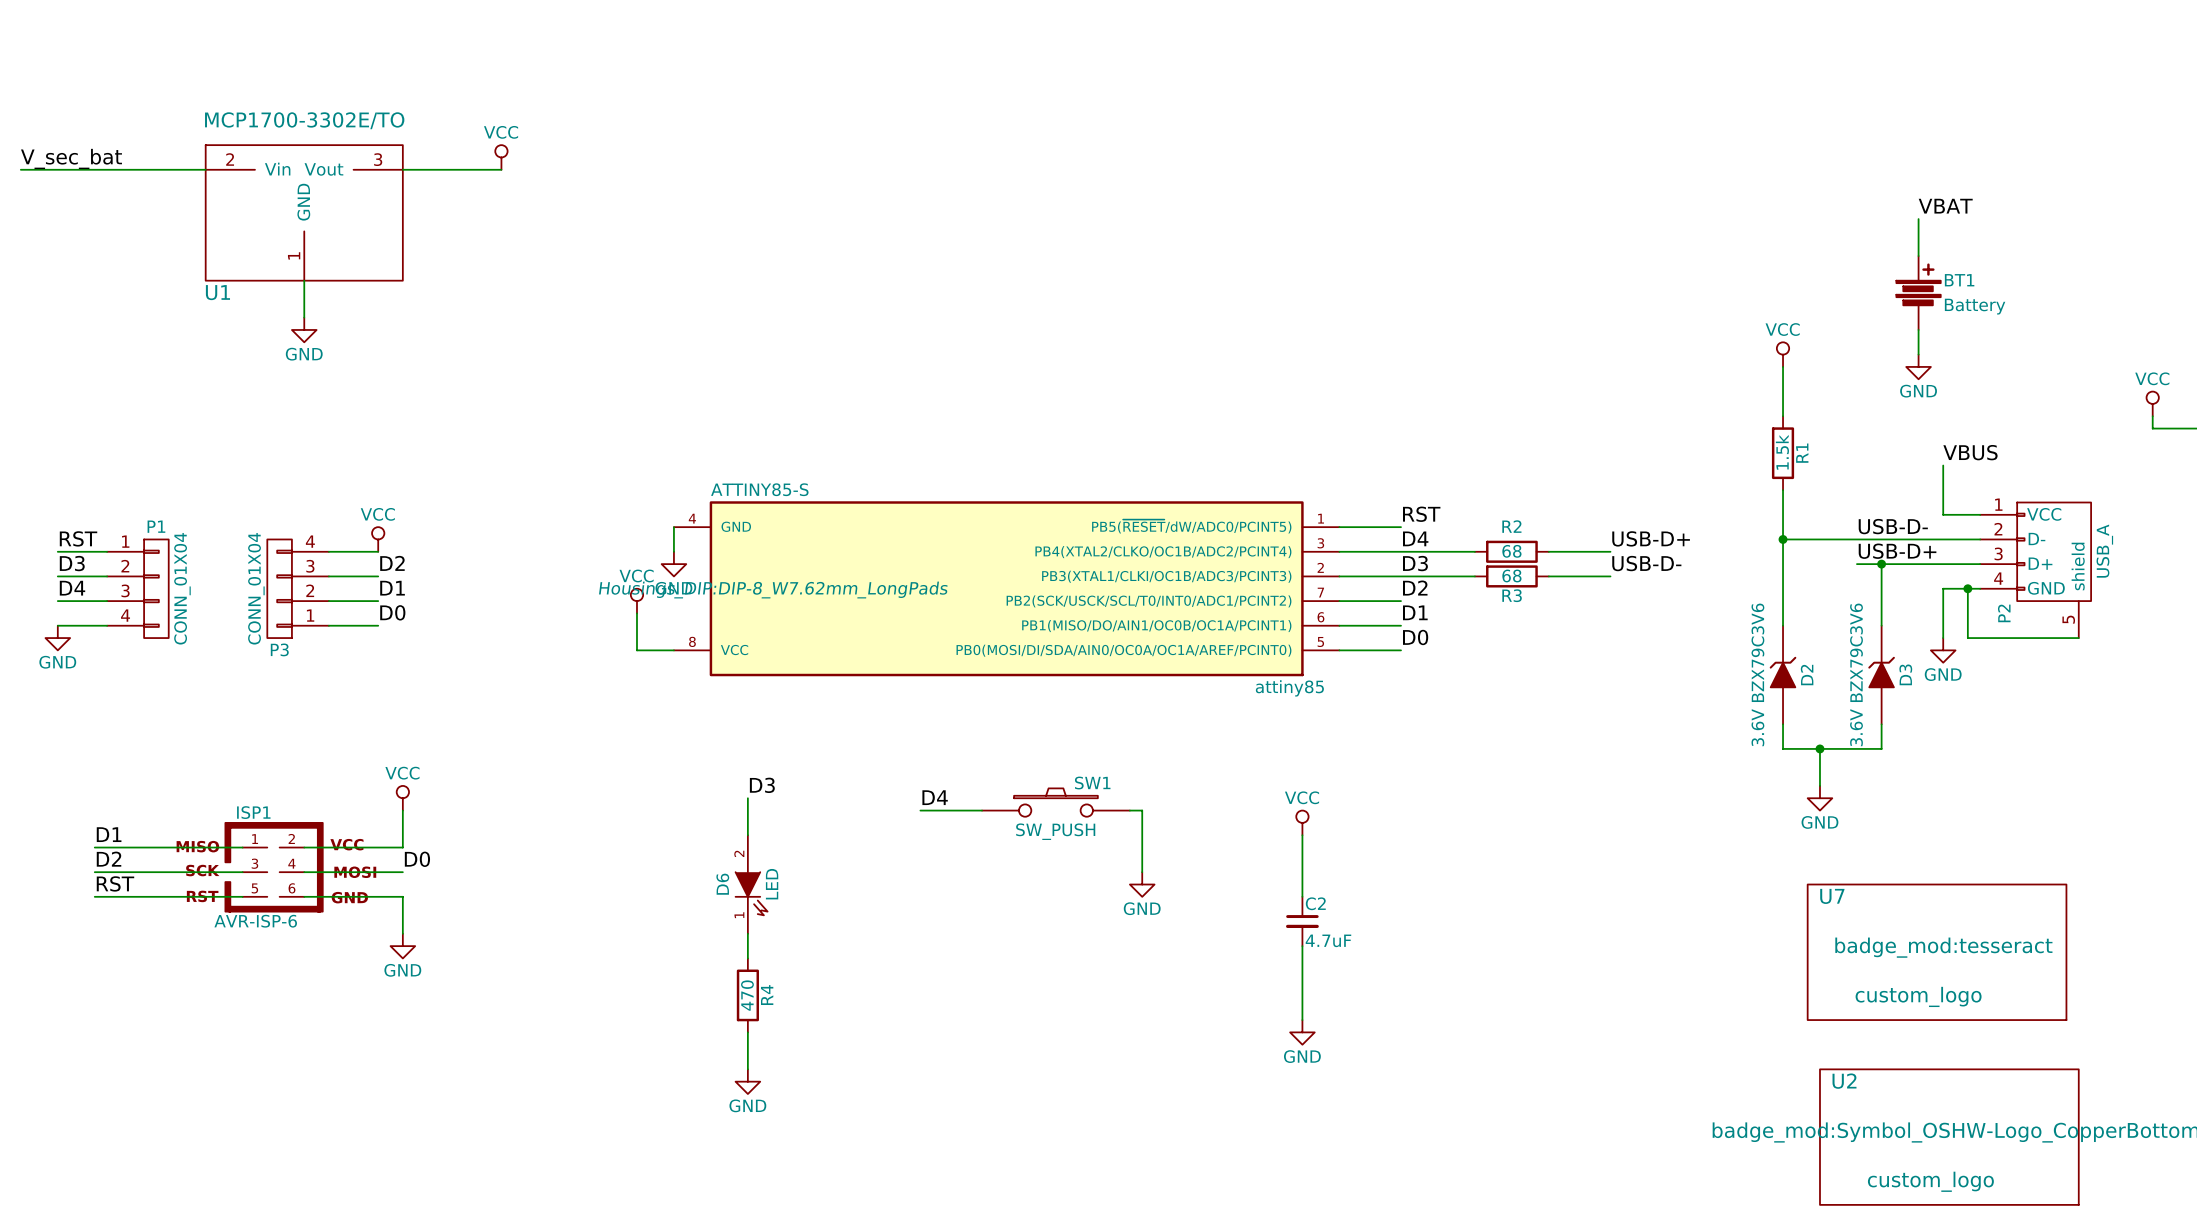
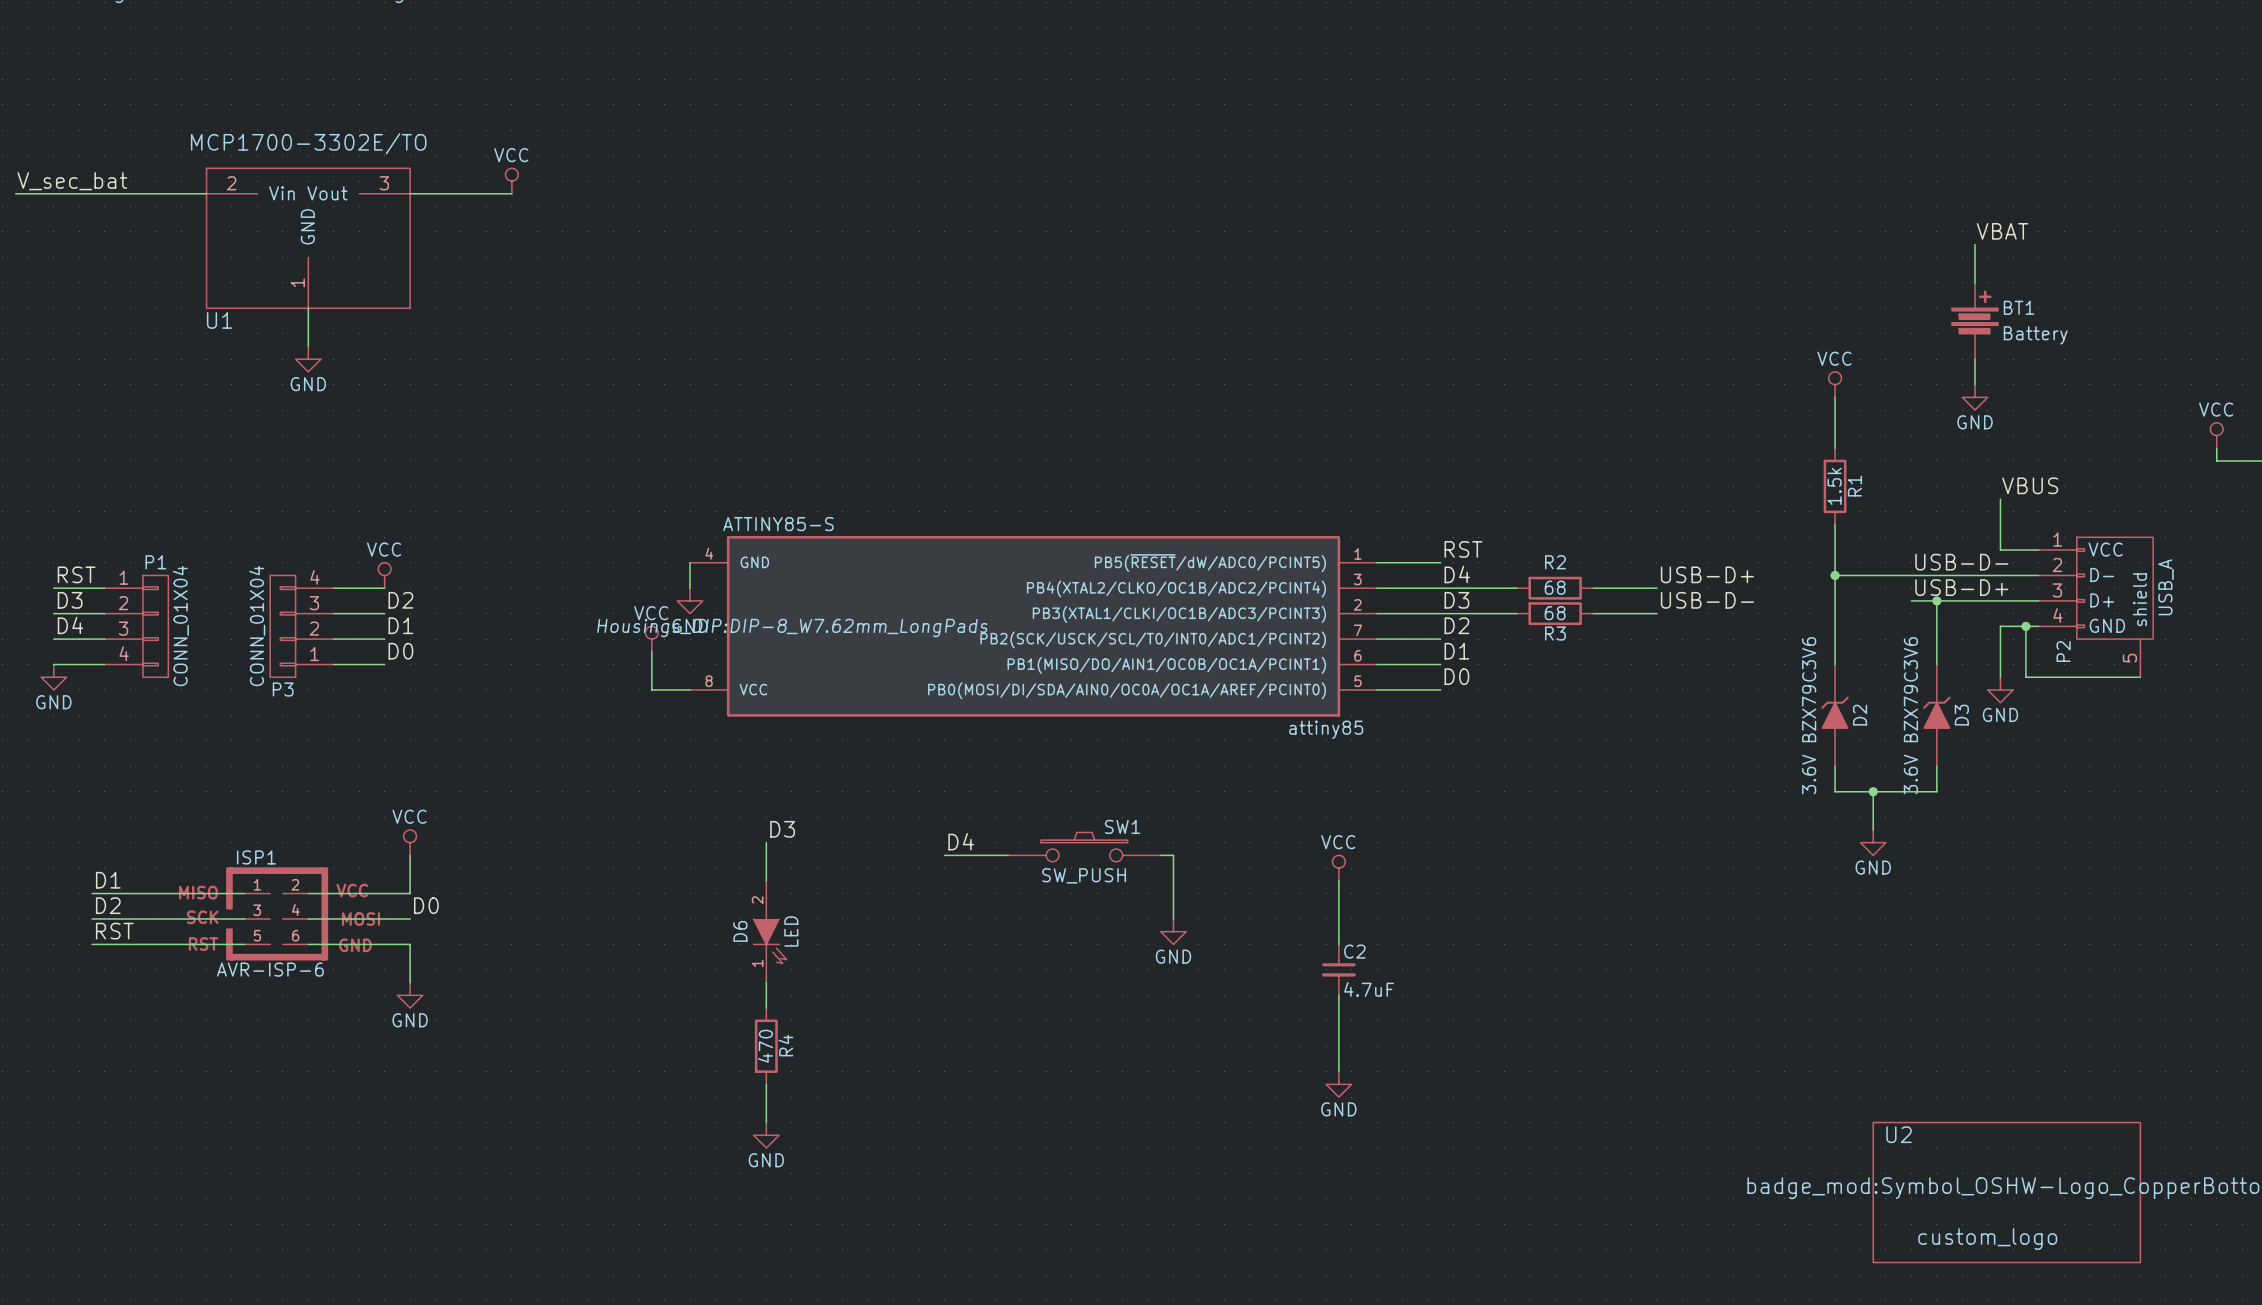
U7: custom_logo (1937, 952) -> none

